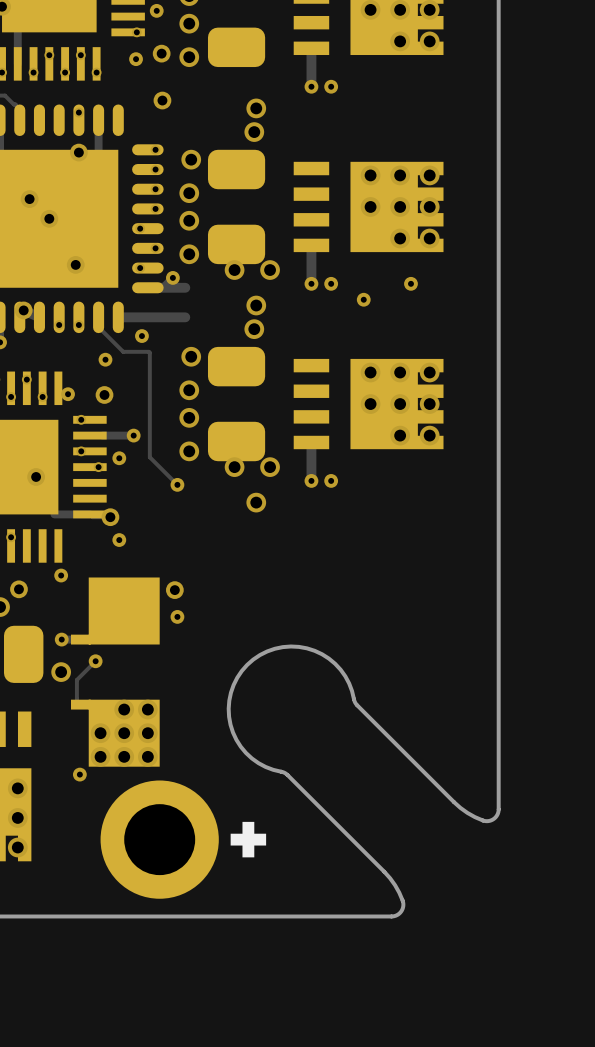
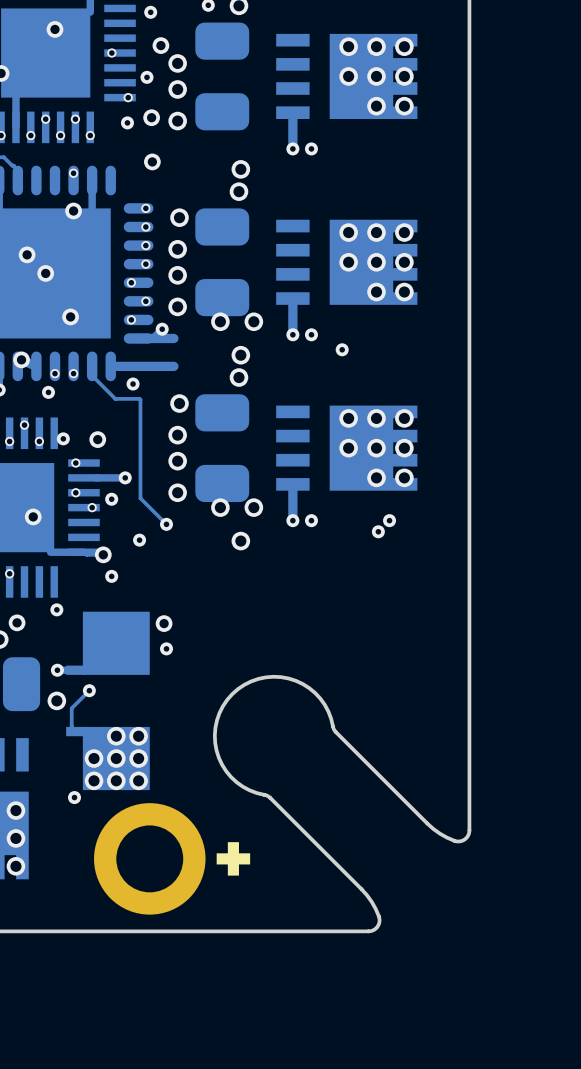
via: (410, 283) -> none
via position: (105, 359) -> (48, 392)
via: none -> (389, 520)
via: none -> (378, 531)
via: none -> (139, 540)

